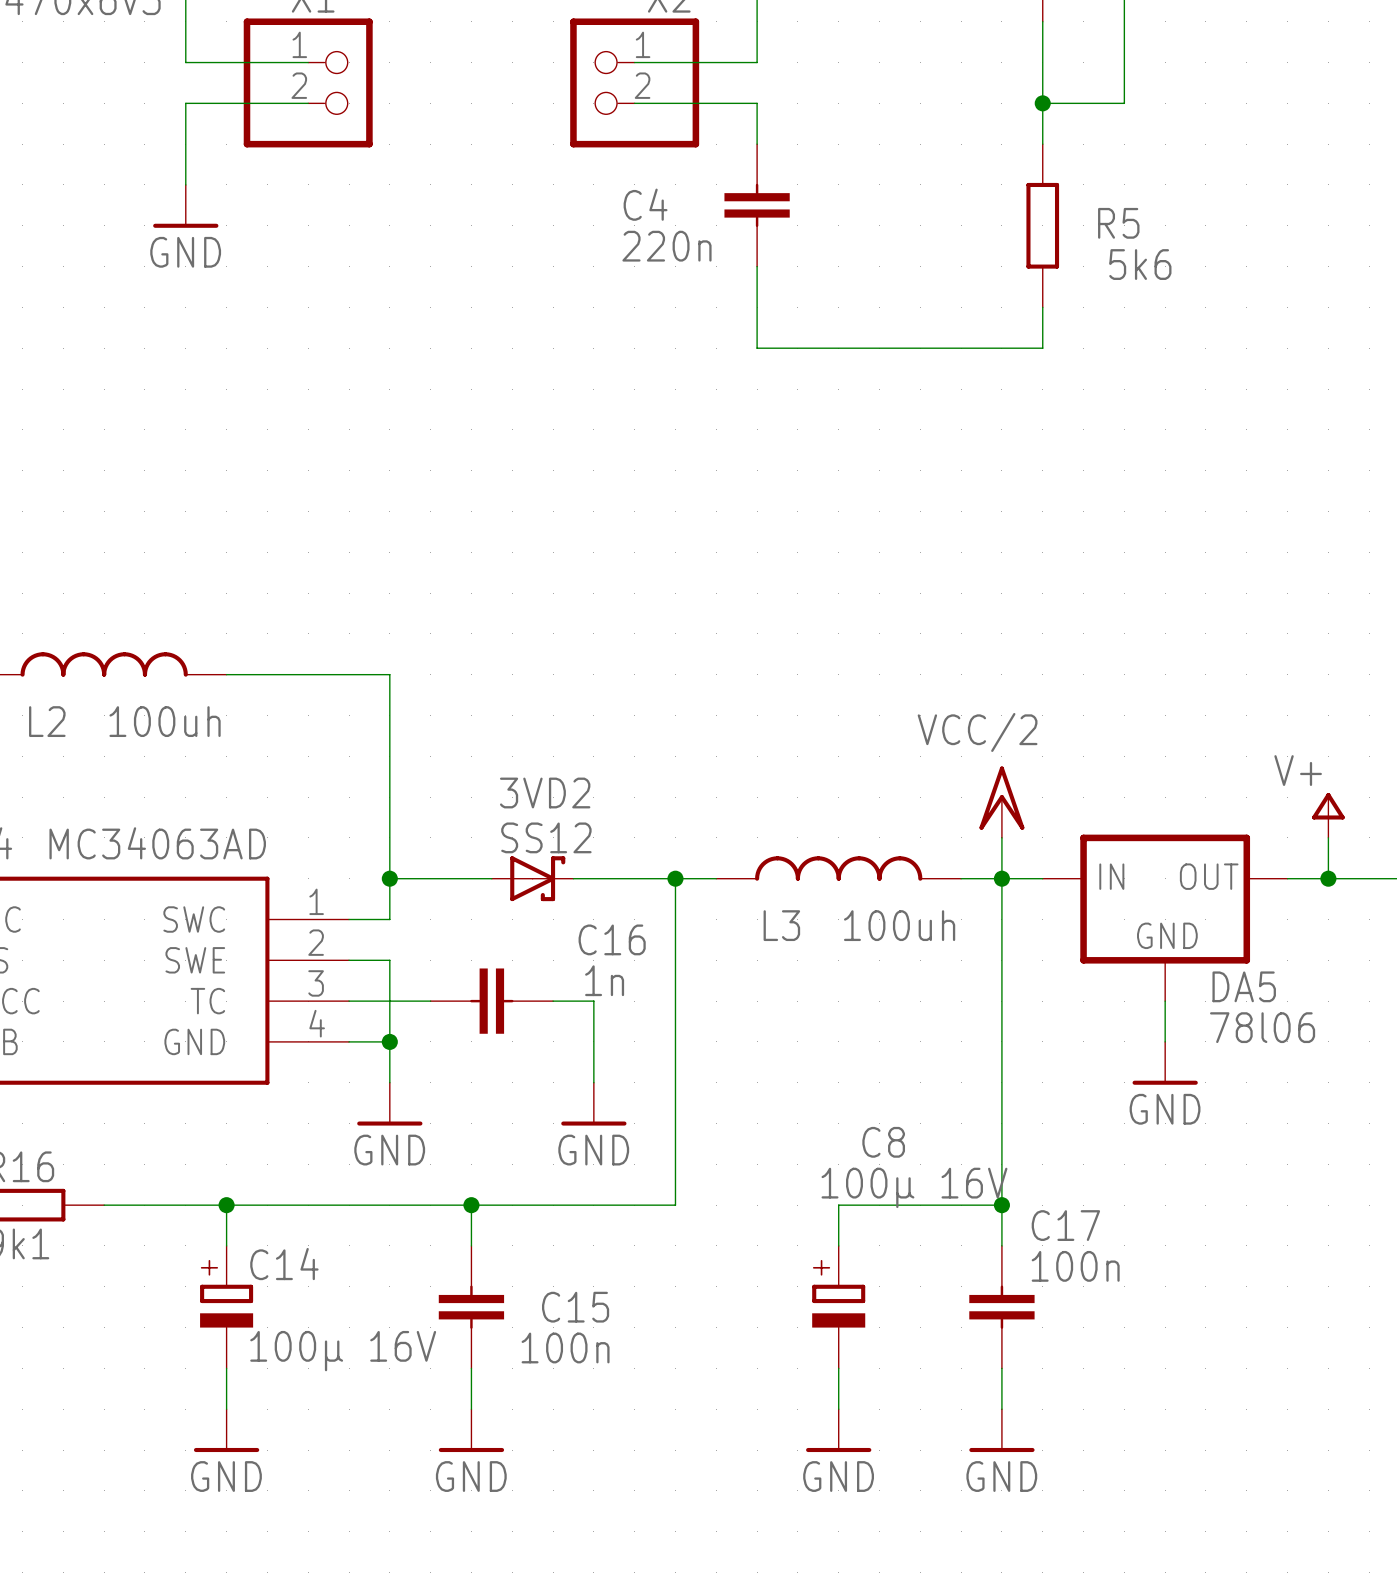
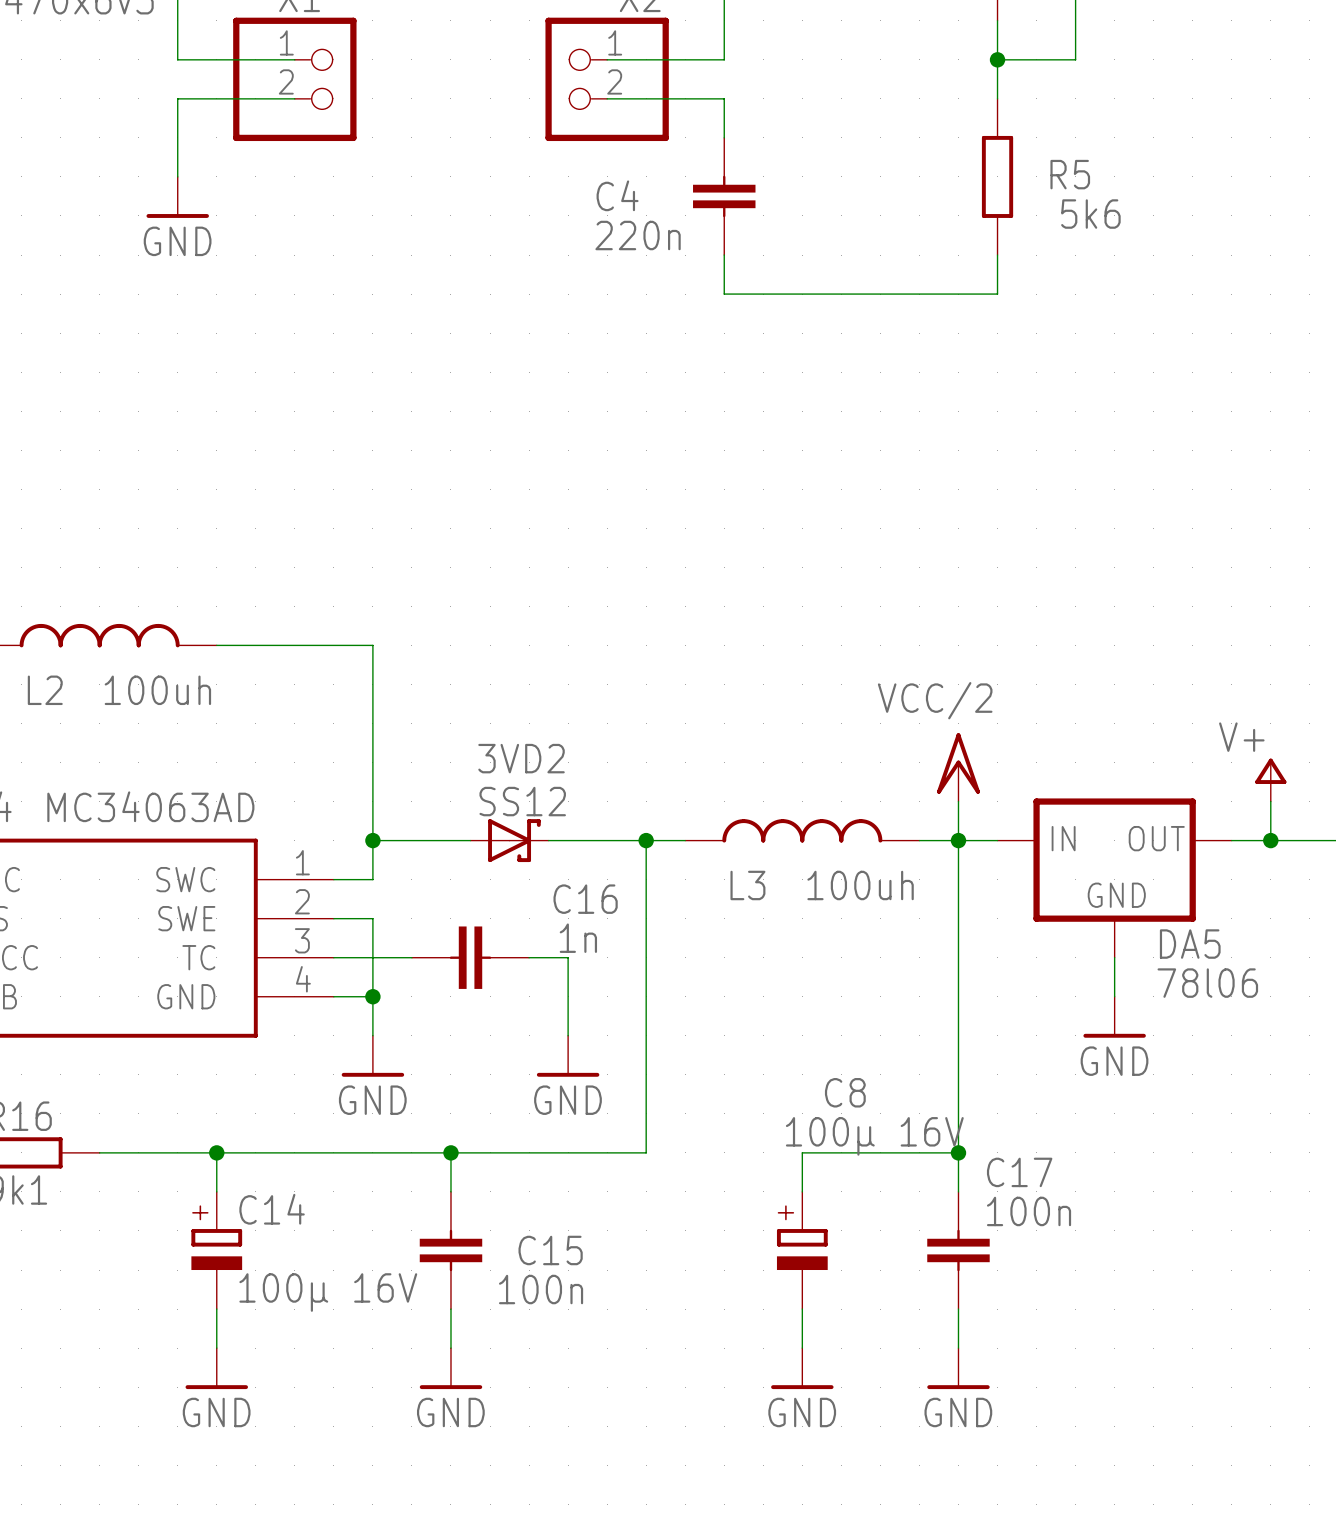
wire: (1124, 62) (1124, 103) (1042, 103) (1042, 144) -> (1075, 59) (997, 59)
junction position: (1042, 103) -> (997, 59)
R5 position: (1042, 225) -> (997, 176)
wire: (757, 307) (757, 348) (1042, 348) (1042, 307) -> (724, 294) (997, 294) (997, 255)

